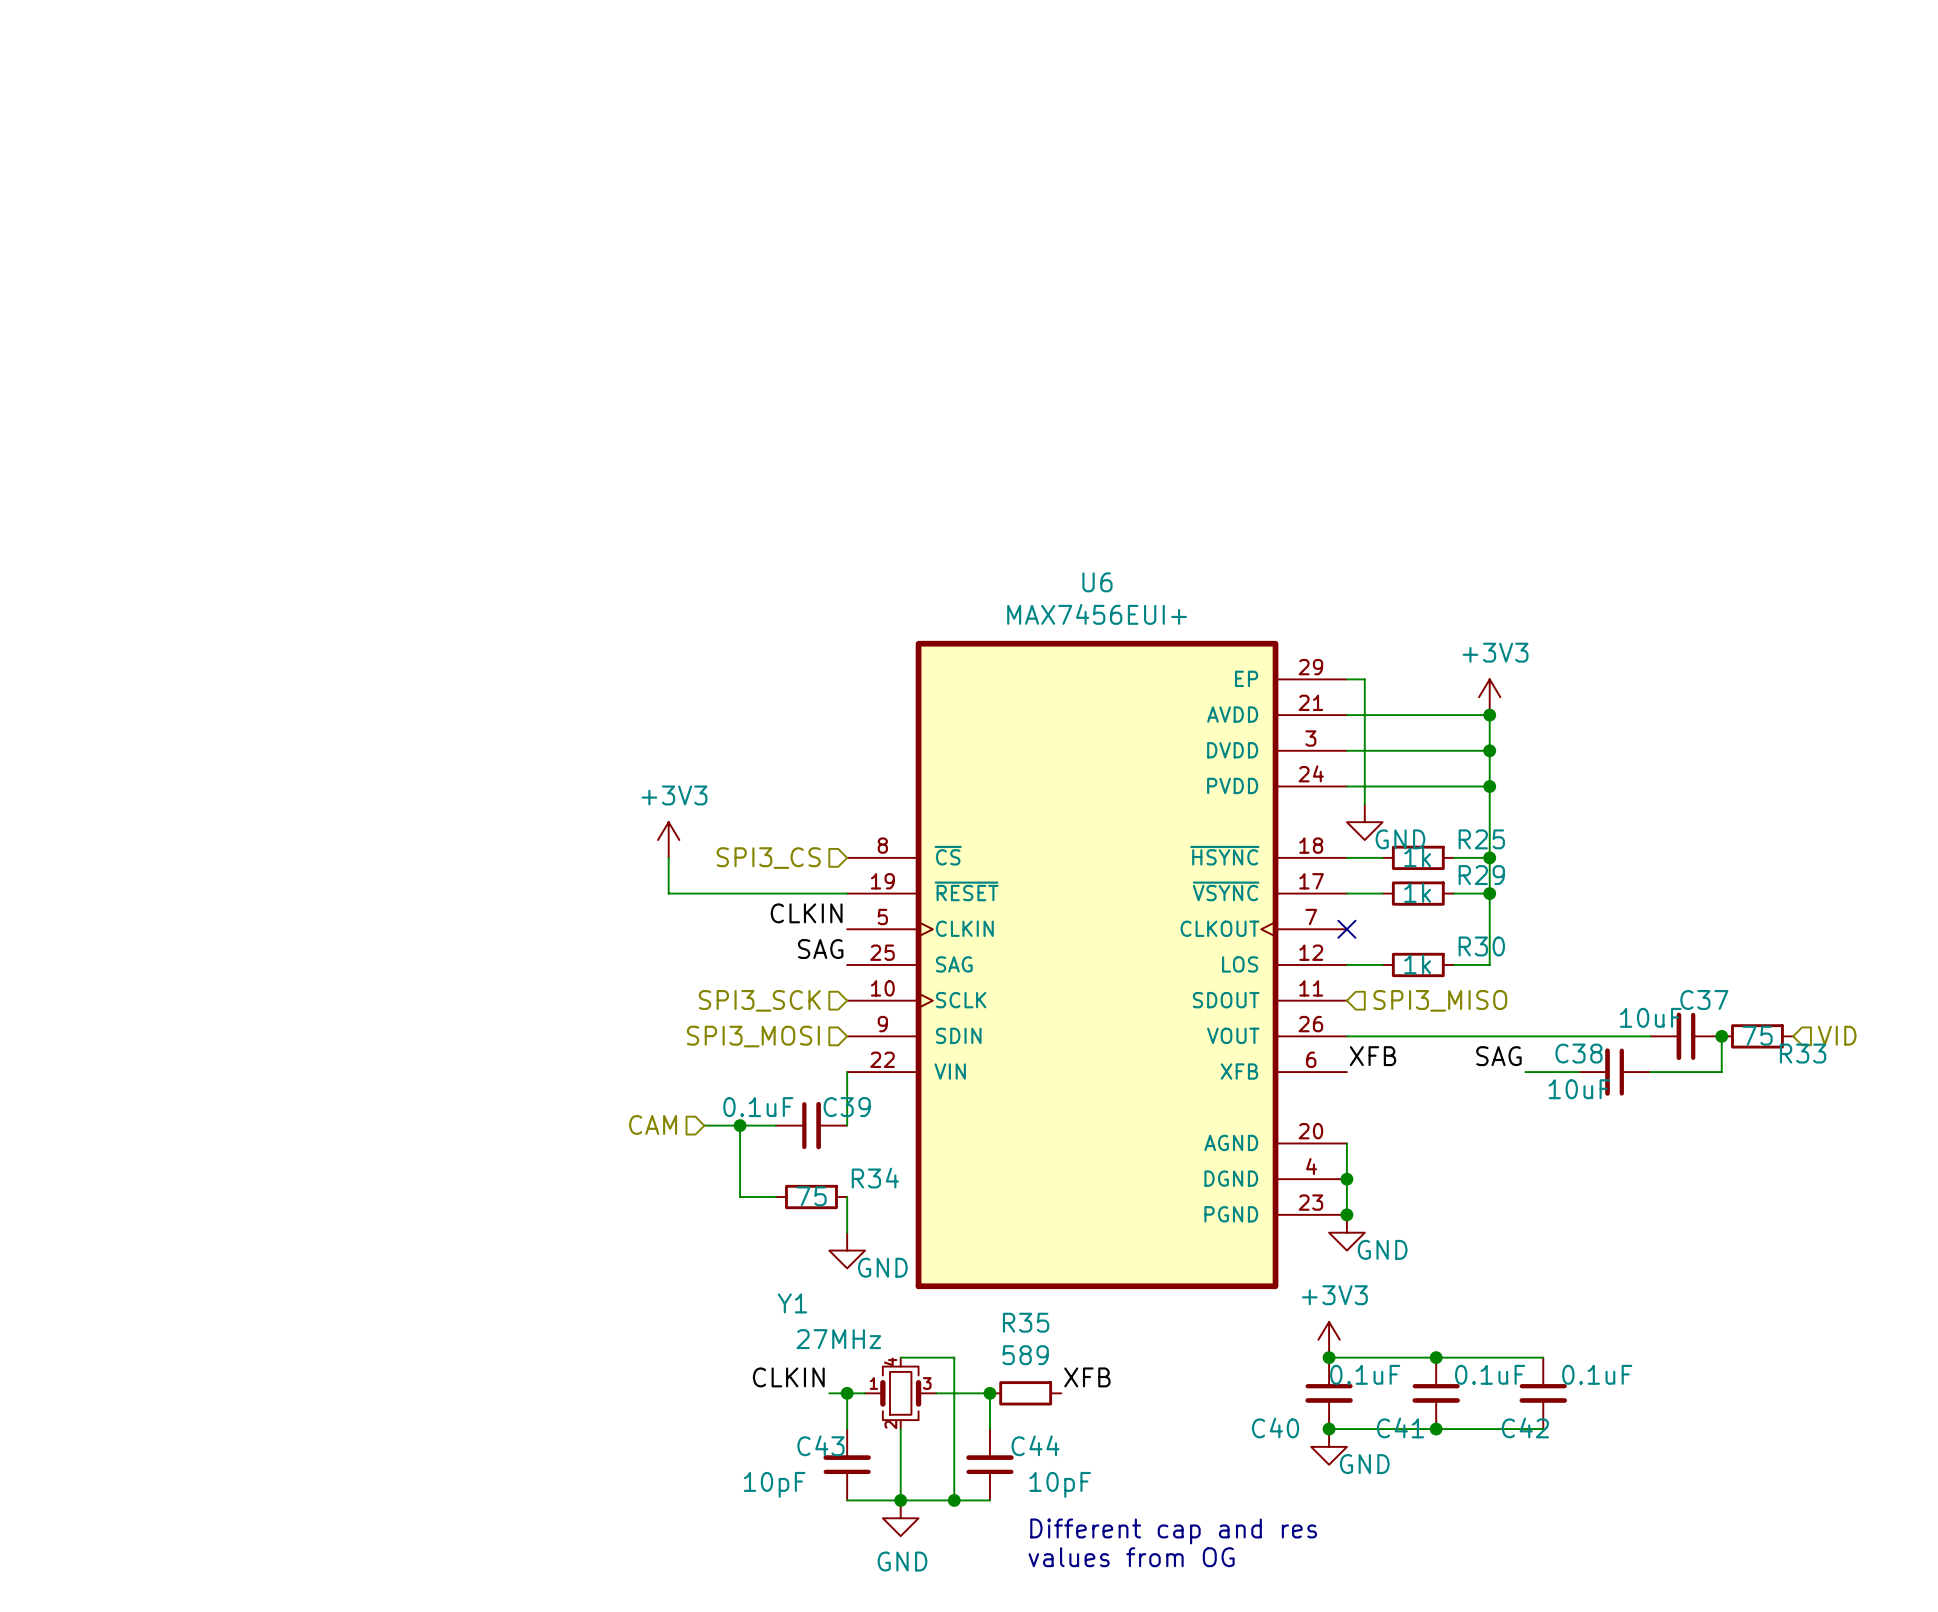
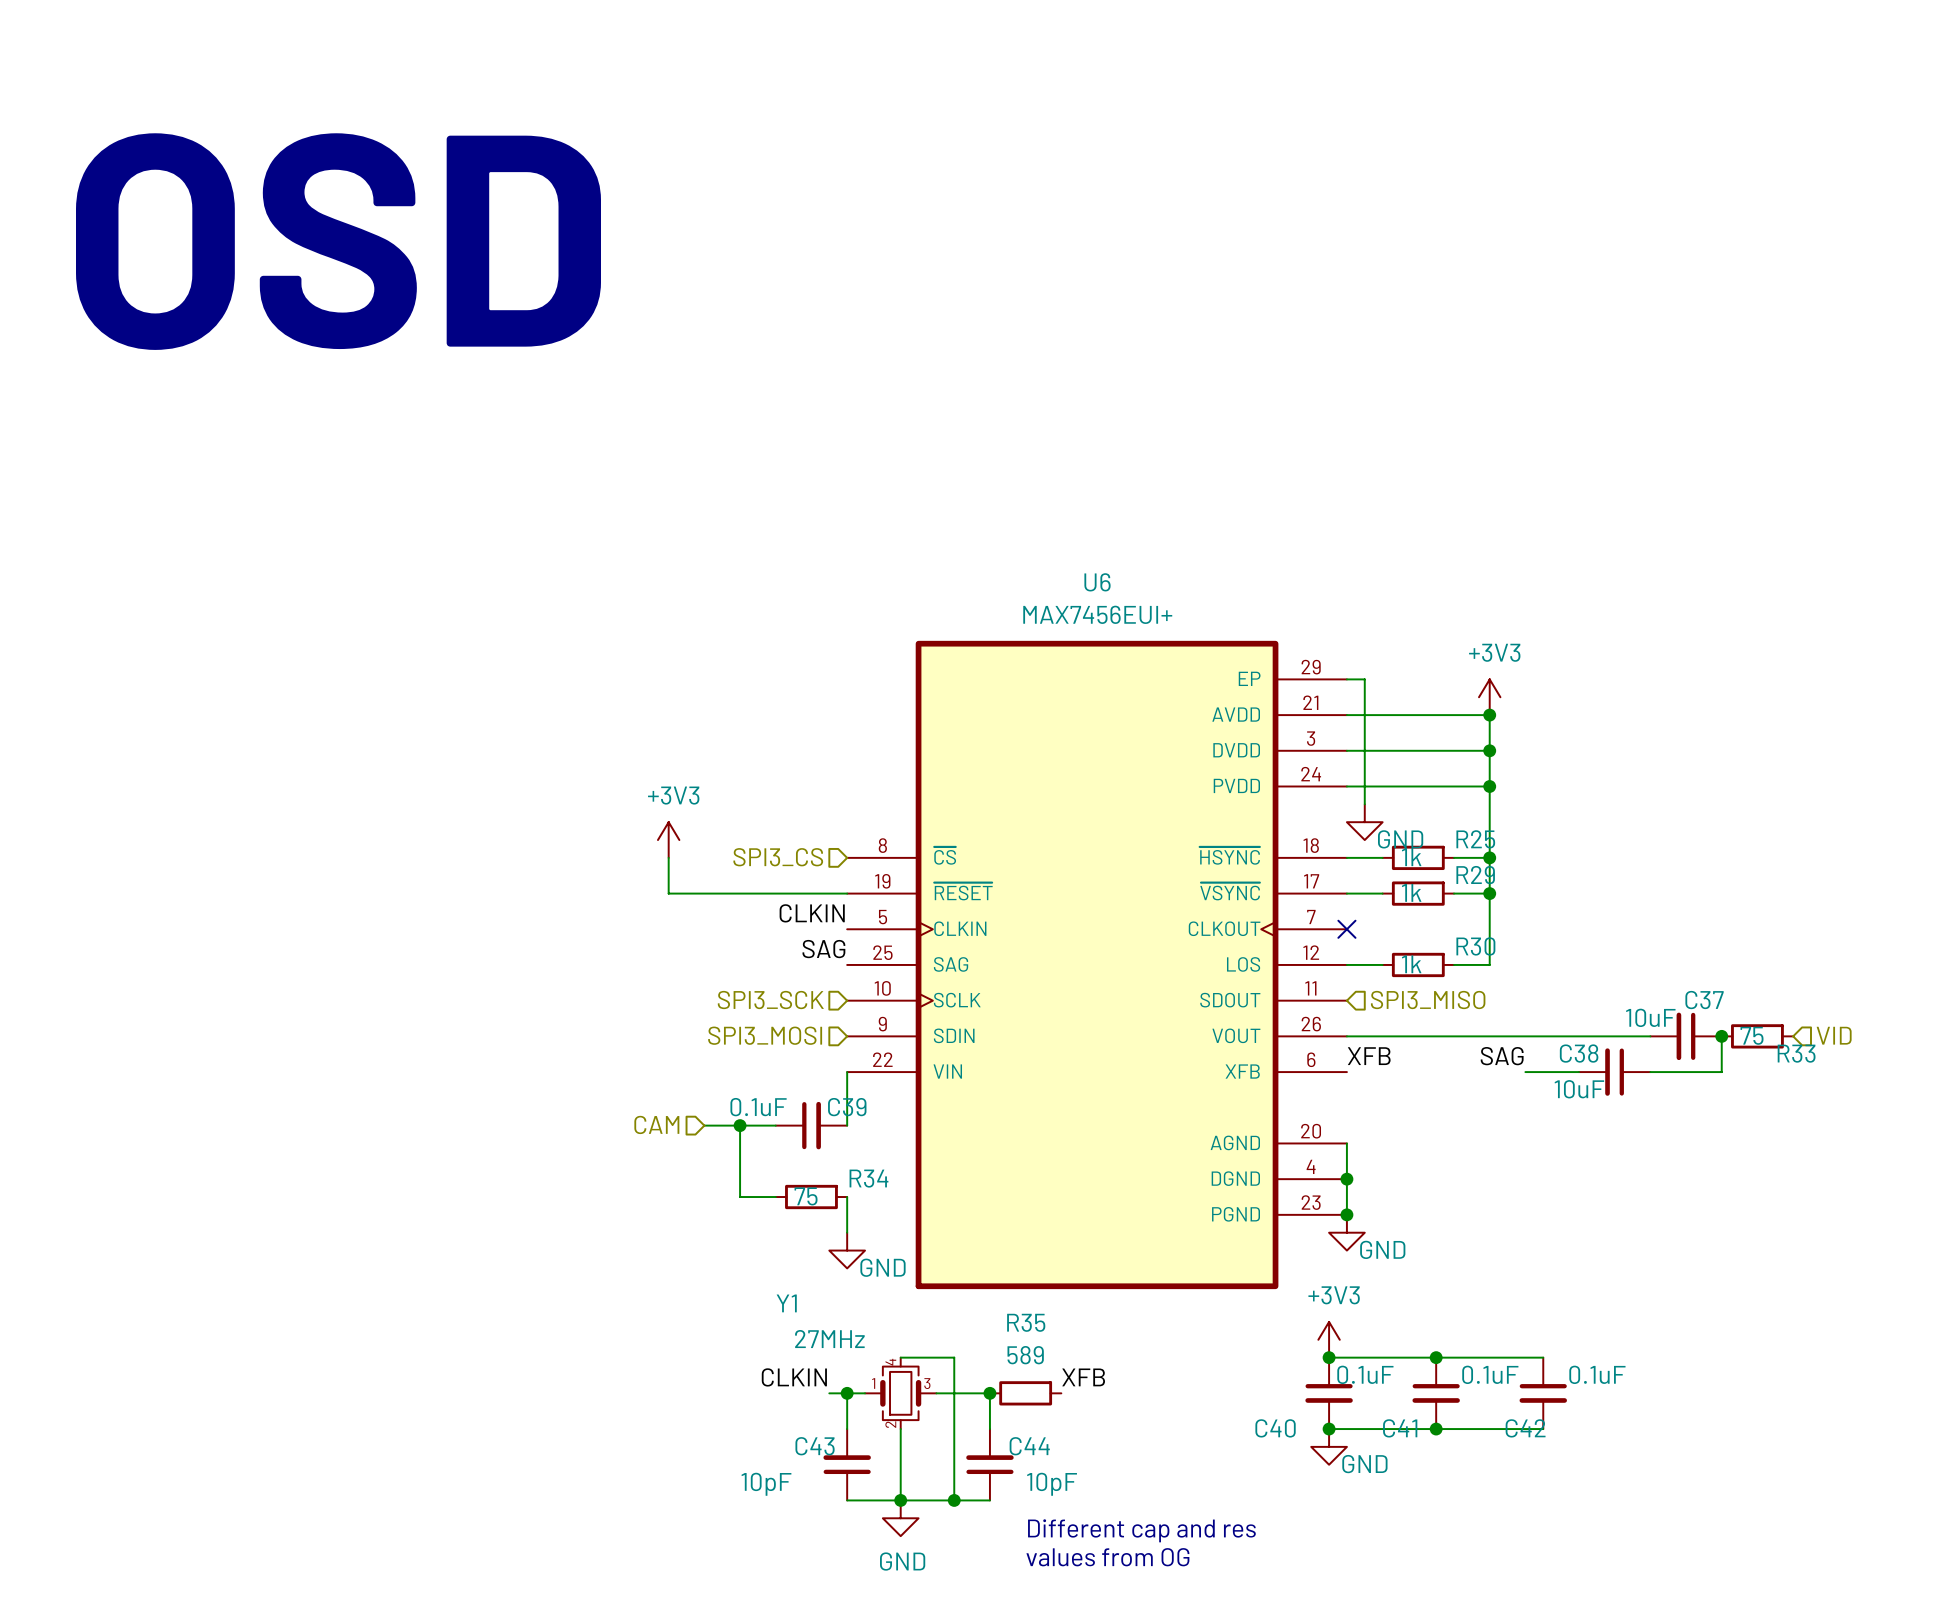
text: none -> OSD (338, 241)

